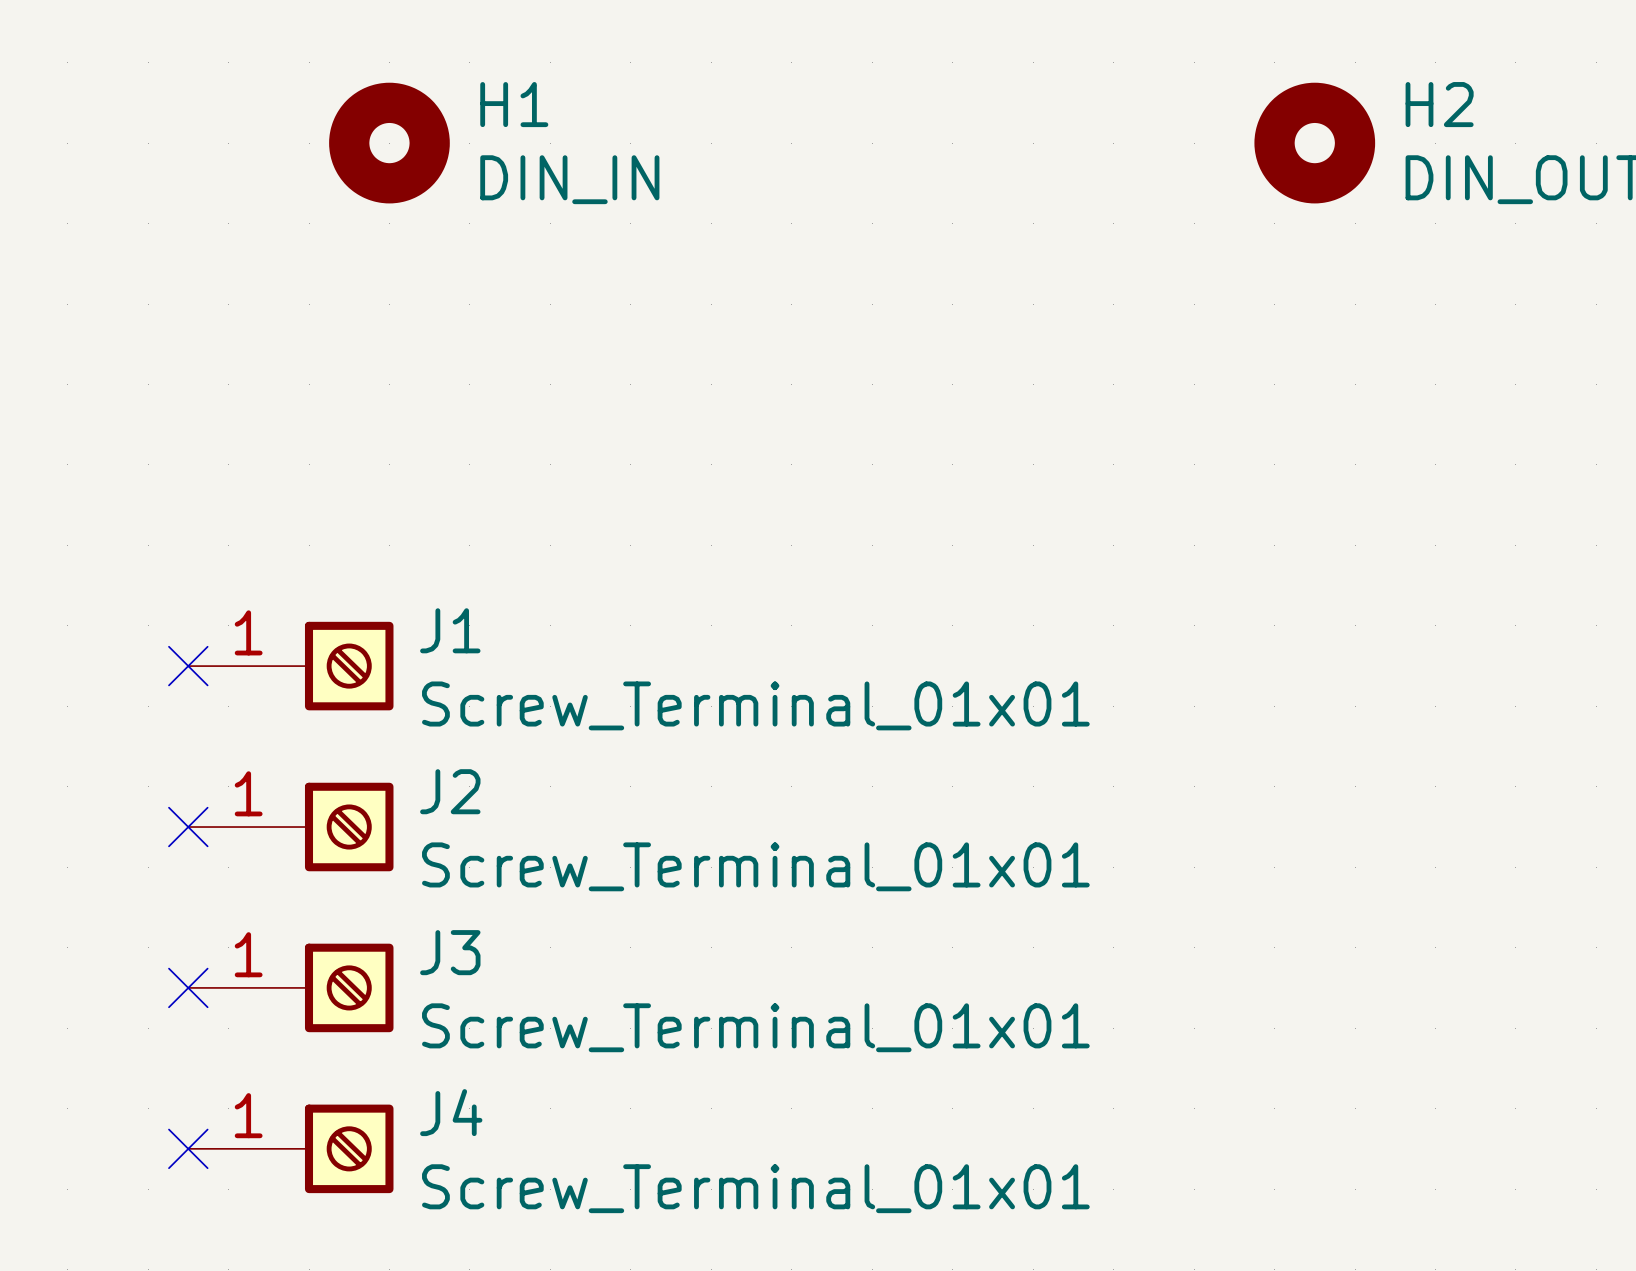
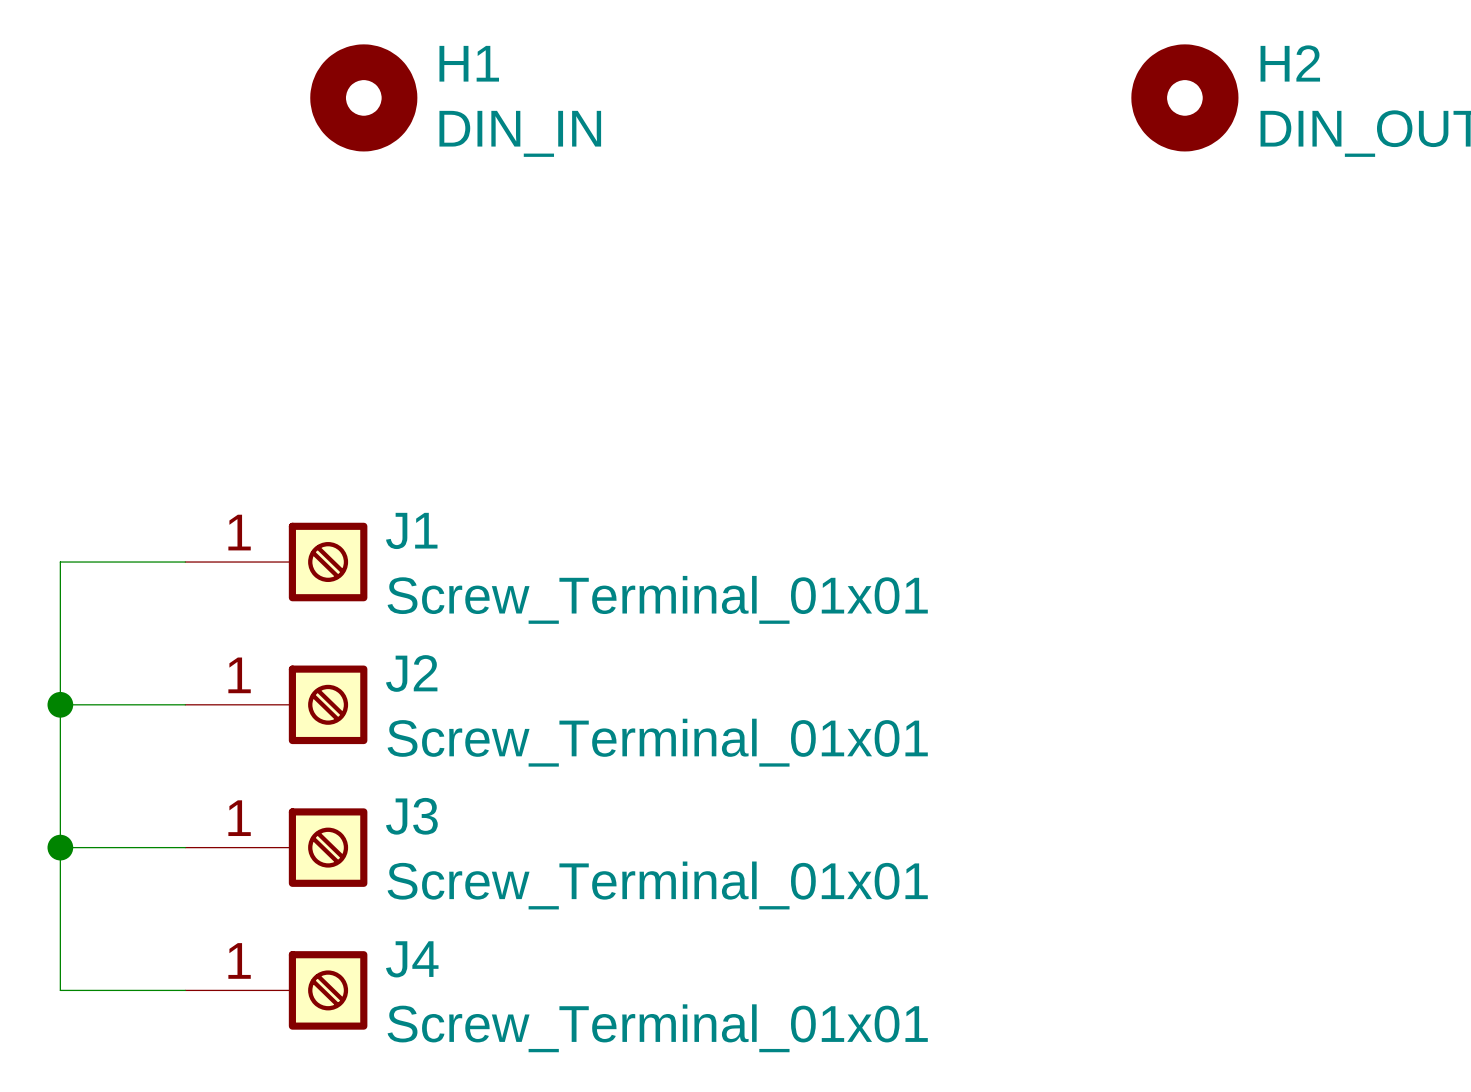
wire: none -> (185, 562) (60, 562) (60, 990) (185, 990)
no-connect mark: (188, 666) -> none
wire: none -> (60, 704) (185, 704)
junction: none -> (60, 704)
no-connect mark: (188, 827) -> none
wire: none -> (60, 847) (185, 847)
junction: none -> (60, 847)
no-connect mark: (188, 987) -> none
no-connect mark: (188, 1148) -> none

